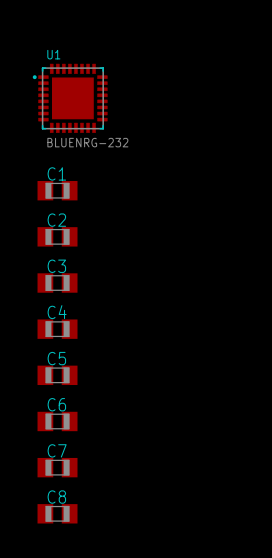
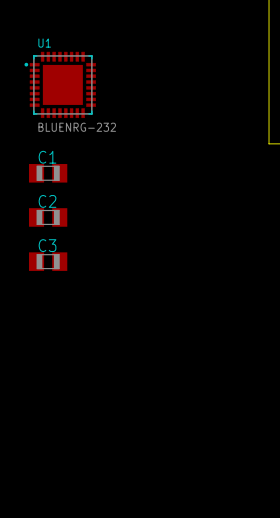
C4: (57, 329) -> none
C5: (57, 375) -> none
C6: (57, 421) -> none
C7: (57, 467) -> none
C8: (57, 513) -> none

